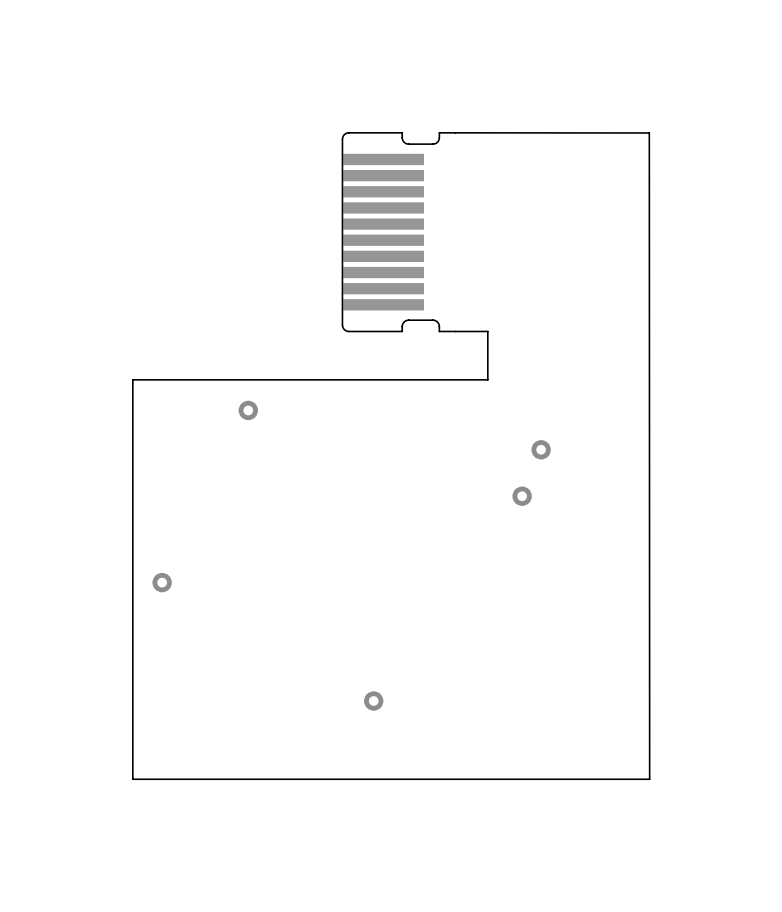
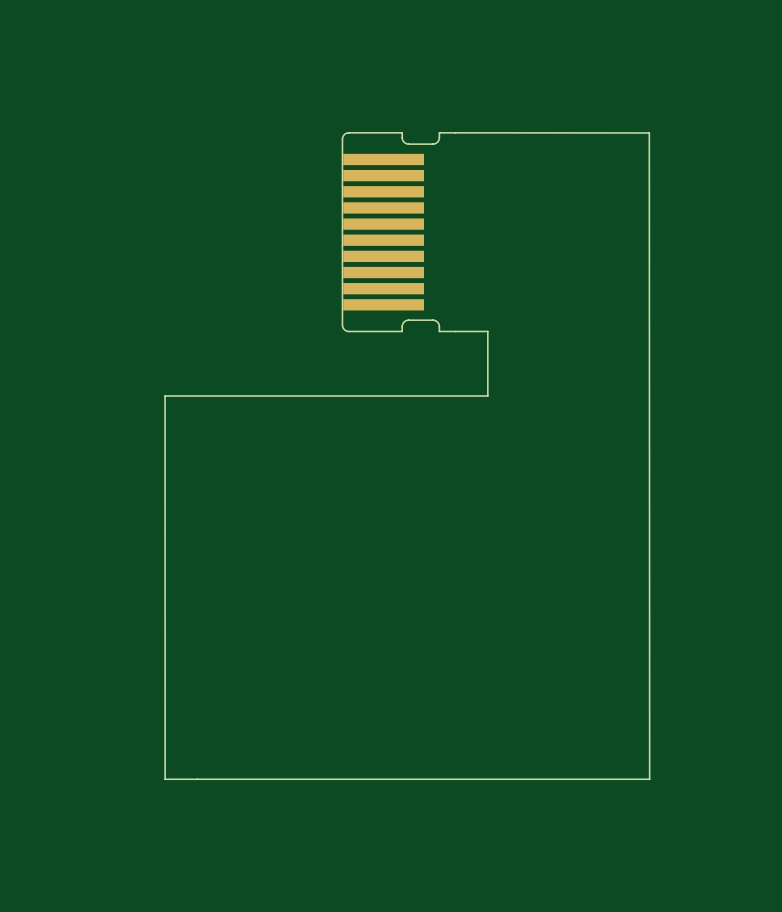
board edge: (487, 379) (132, 379) (132, 779) (165, 779) -> (487, 379) (487, 396) (165, 396) (165, 779)
via: (248, 410) -> none
via: (541, 449) -> none
via: (522, 496) -> none
via: (162, 582) -> none
via: (373, 701) -> none

